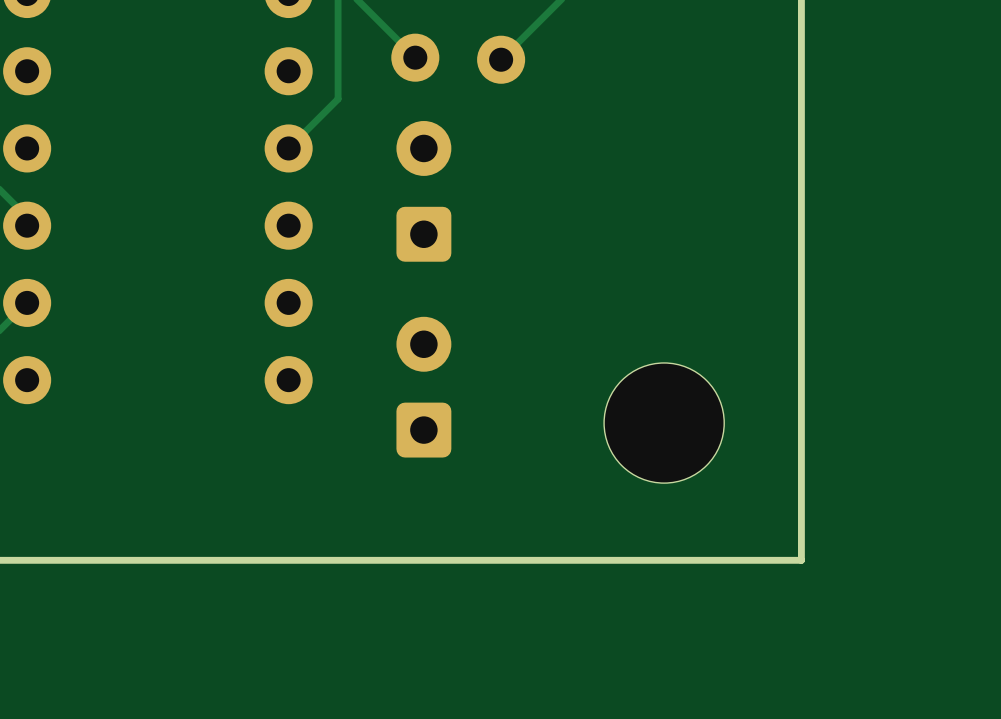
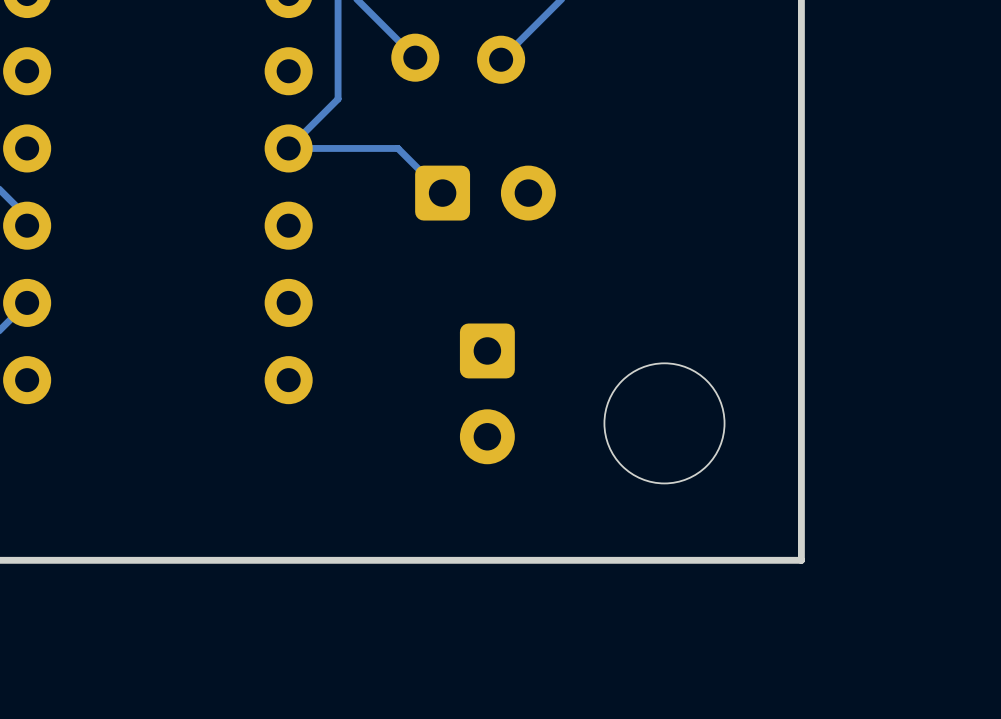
track: none -> (288, 148) (397, 148) (442, 193)
part rotation: 0° (423, 191) -> 90° clockwise (485, 193)
round board edge: none -> [603, 362, 726, 485]
part rotation: 0° (423, 387) -> 180° (487, 393)
part: (664, 423) -> none

